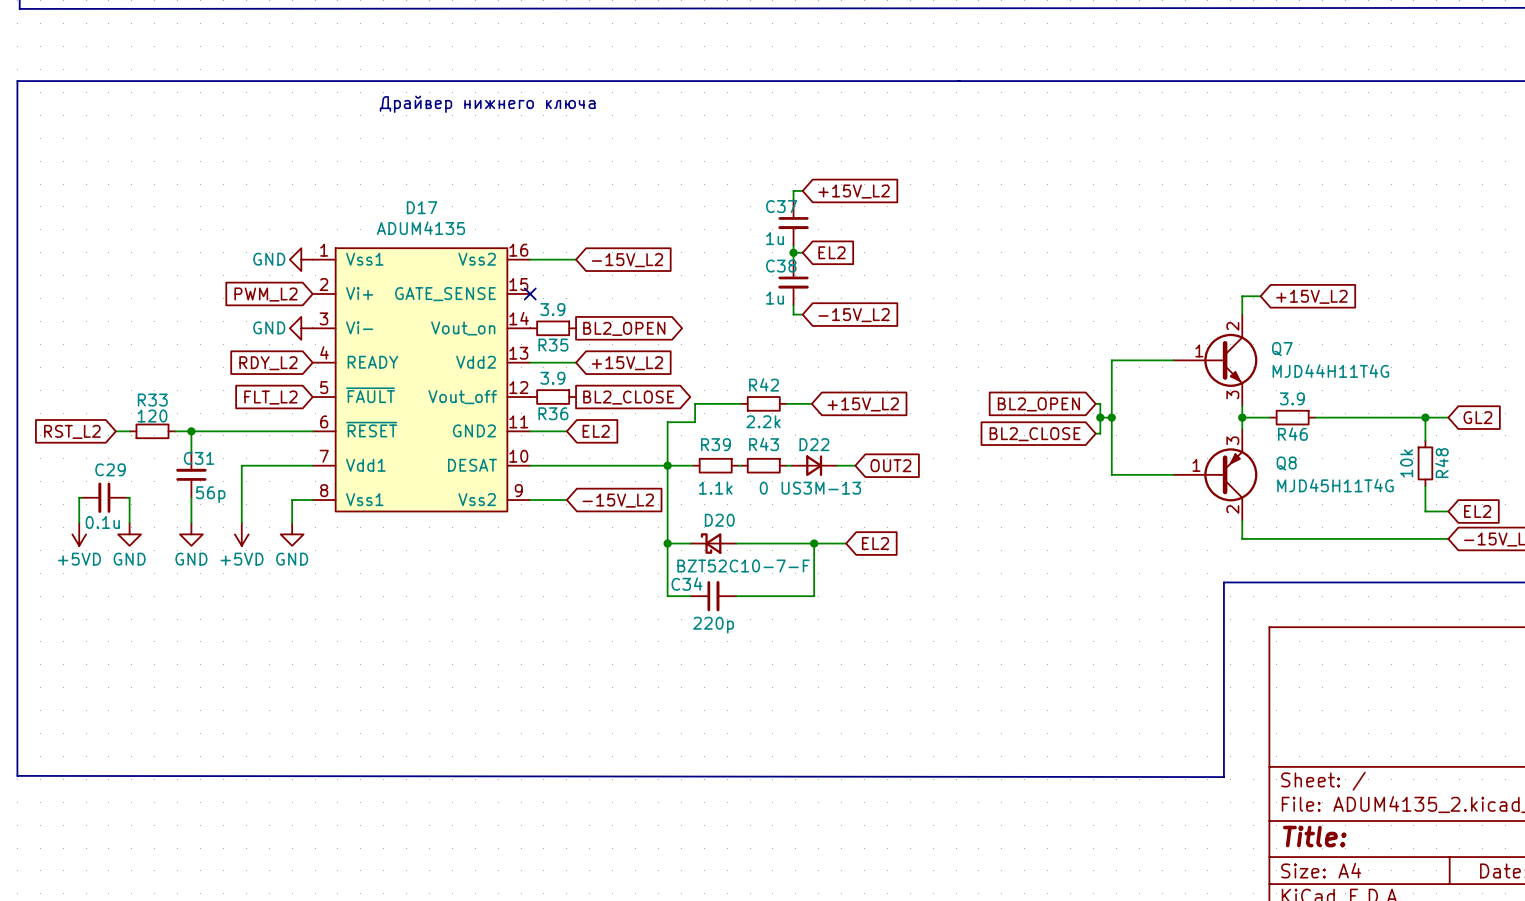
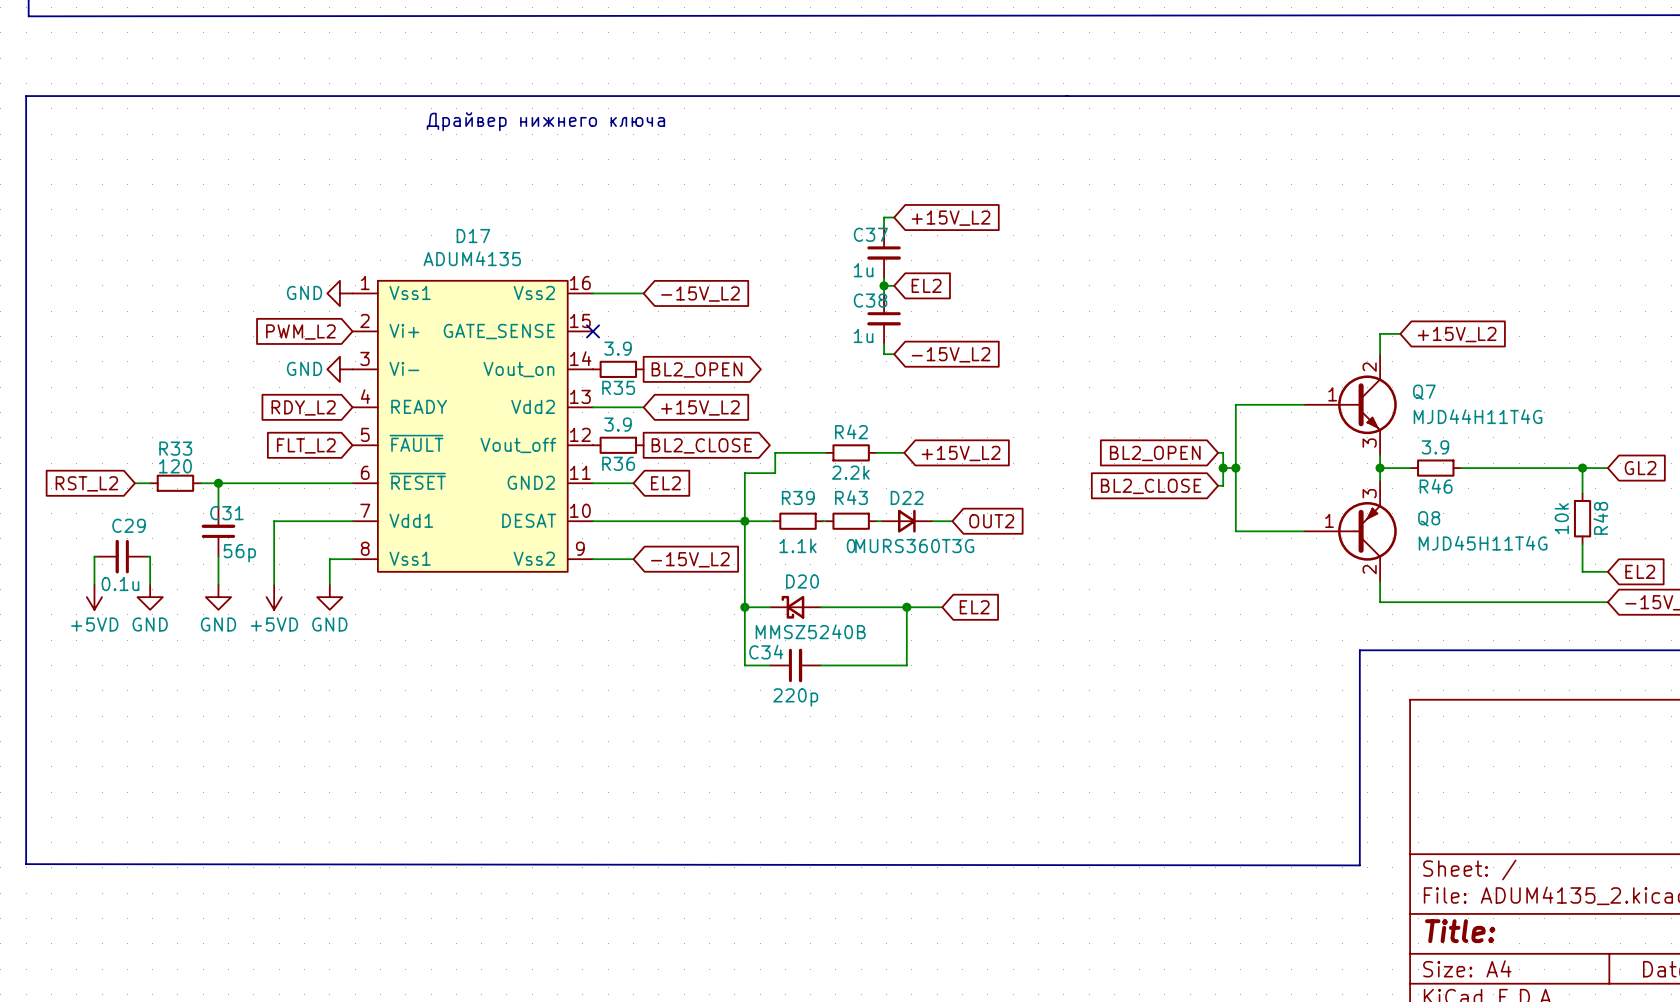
D22 value: US3M-13 (821, 488) -> MURS360T3G (914, 546)
D20 value: BZT52C10-7-F (743, 566) -> MMSZ5240B (810, 631)

